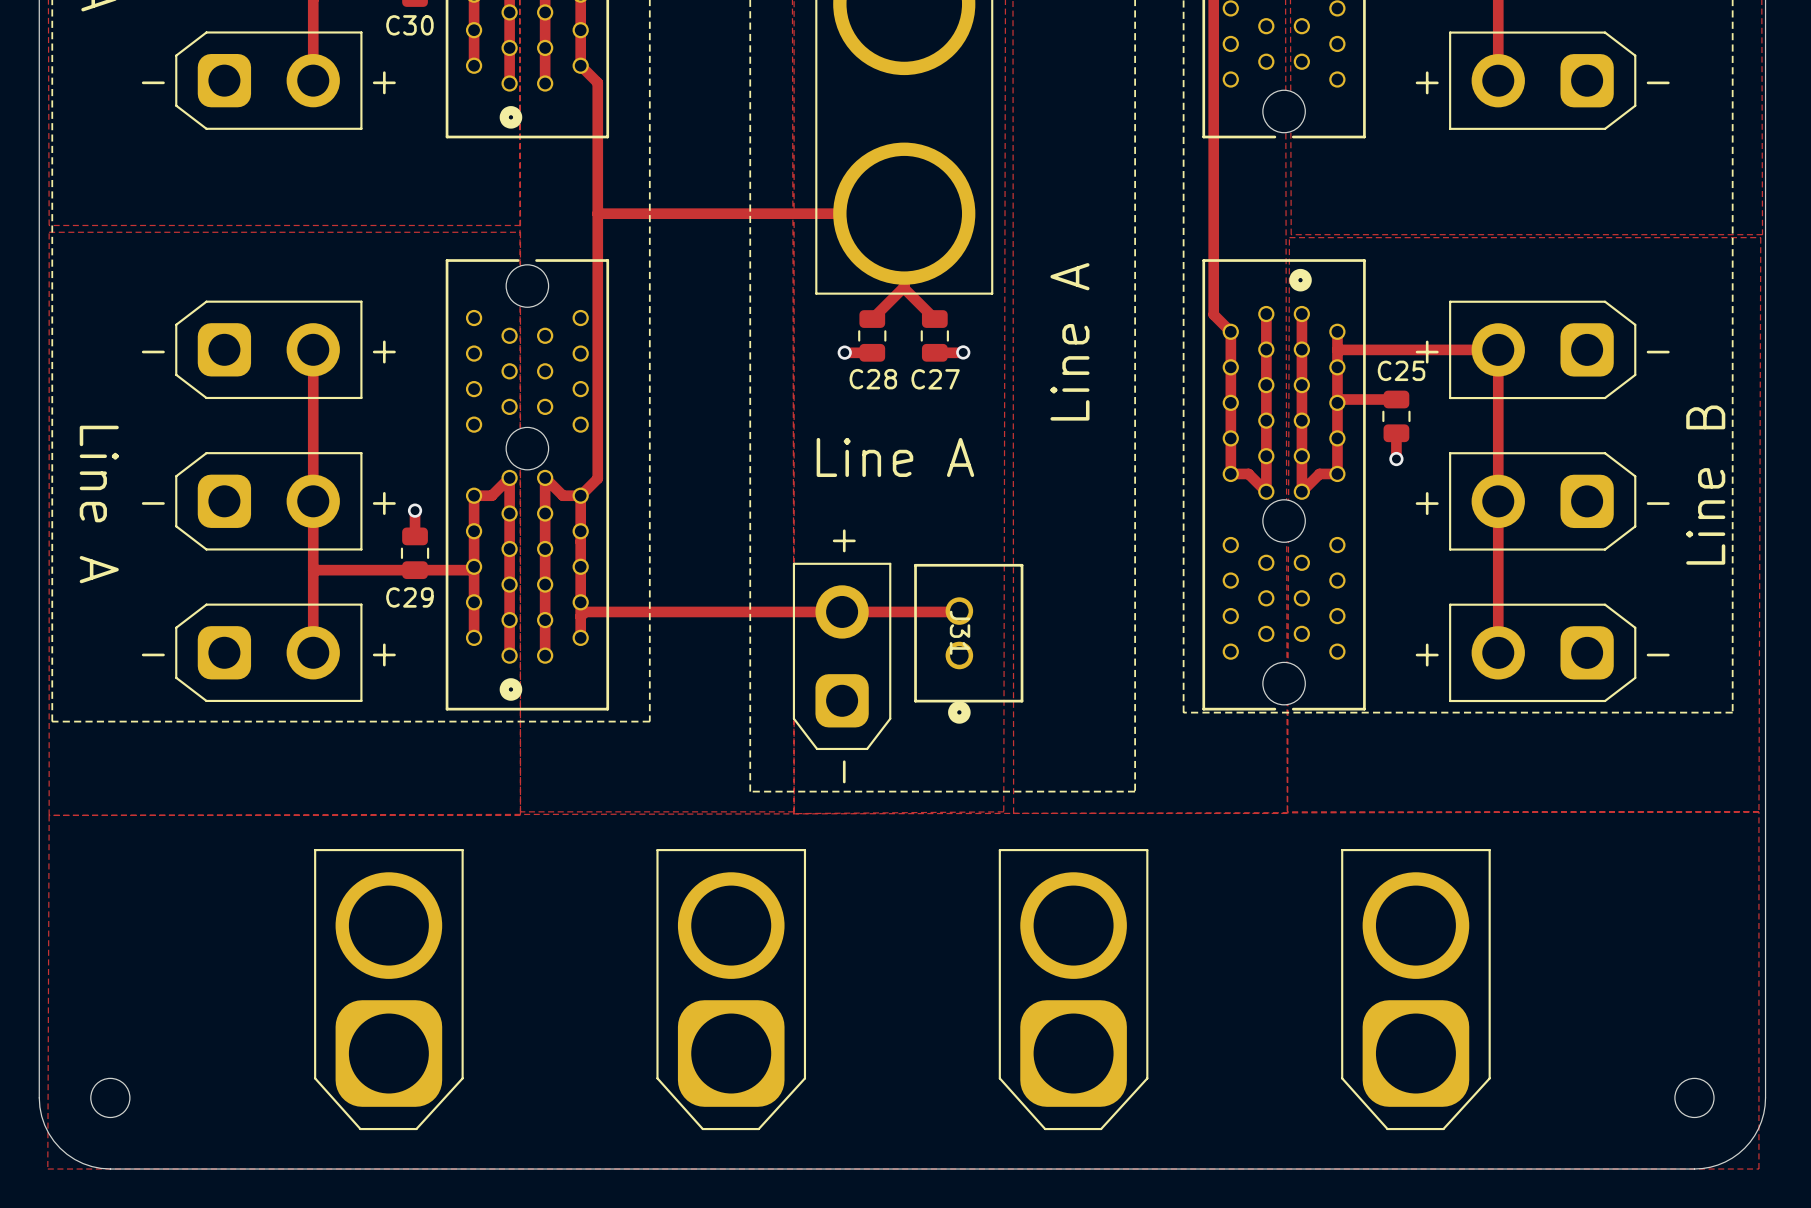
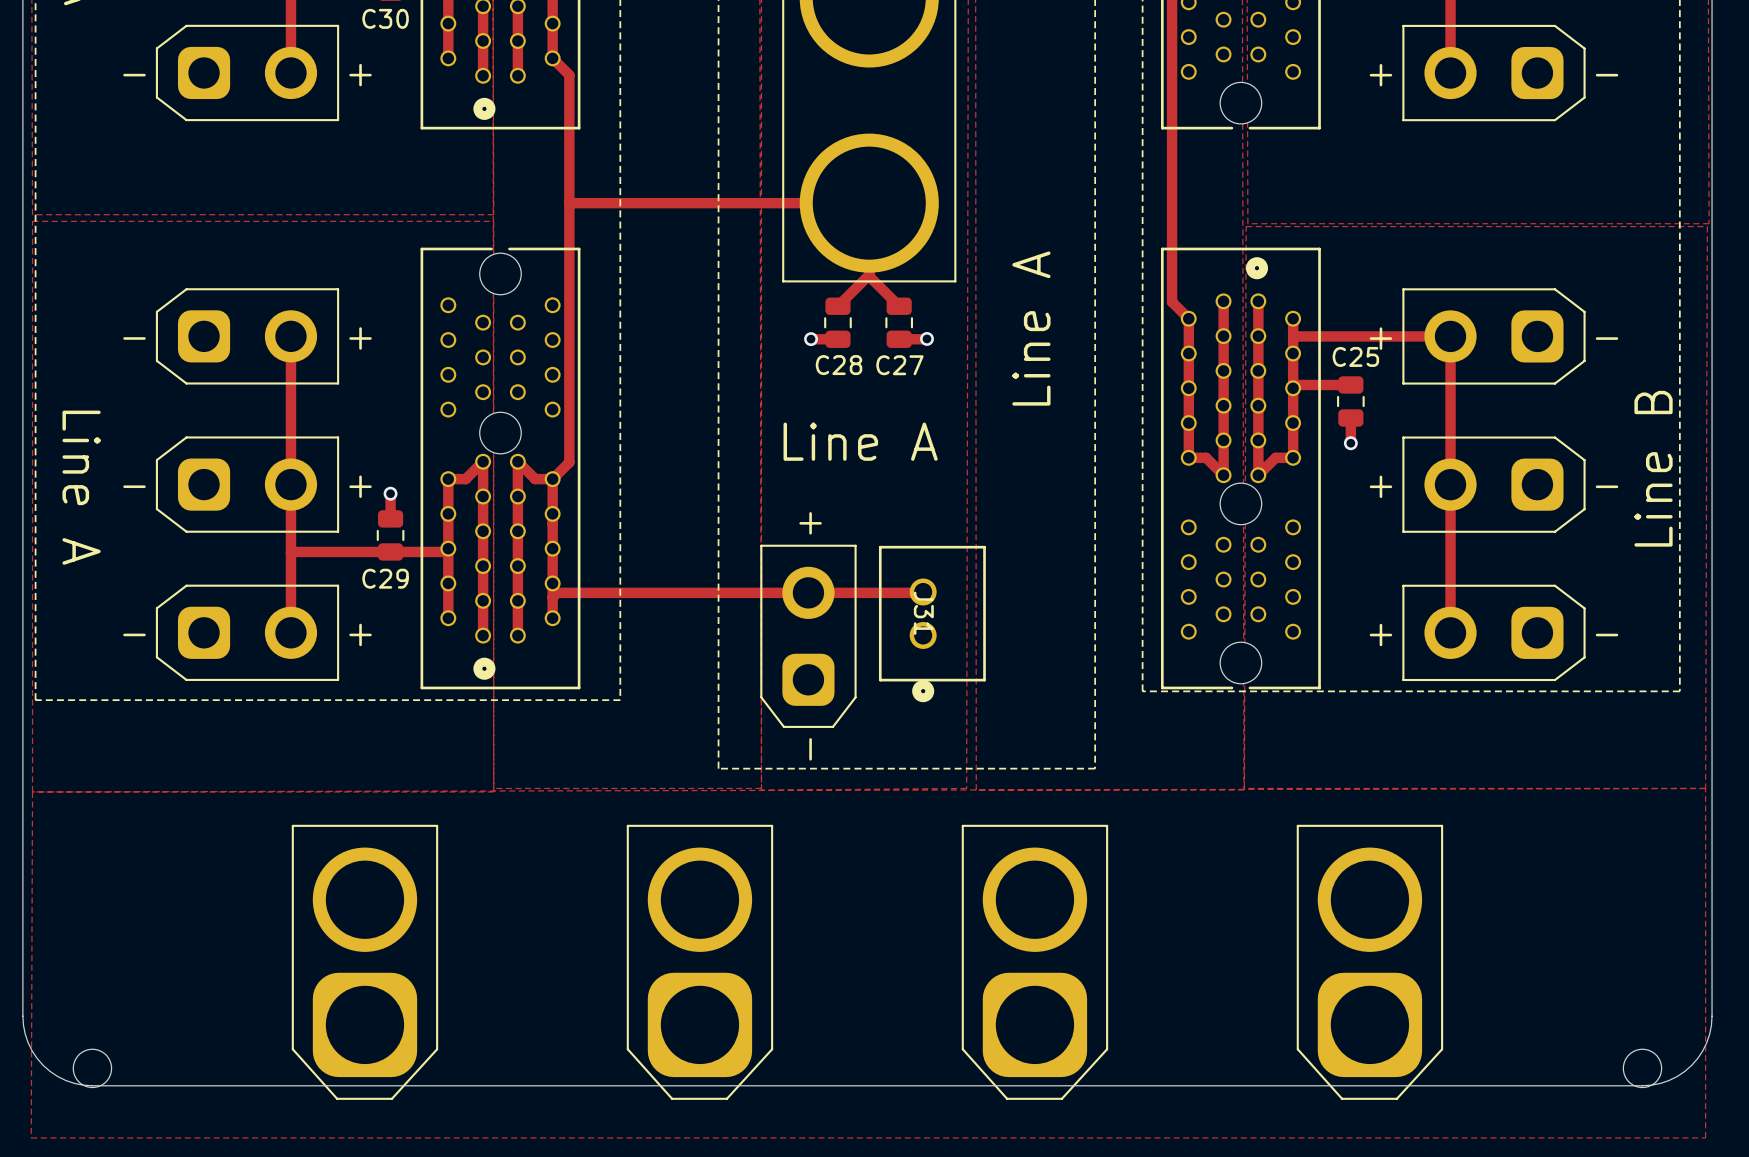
board edge: (39, 1044) (39, 1107) (48, 1133) (60, 1148) (74, 1159) (91, 1166) (110, 1169) (1702, 1168) (1717, 1165) (1738, 1153) (1750, 1142) (1758, 1128) (1765, 1105) (1765, 1044) -> (22, 1016) (28, 1042) (43, 1065) (65, 1080) (92, 1085) (1642, 1085) (1669, 1080) (1691, 1065) (1706, 1042) (1712, 1016)

